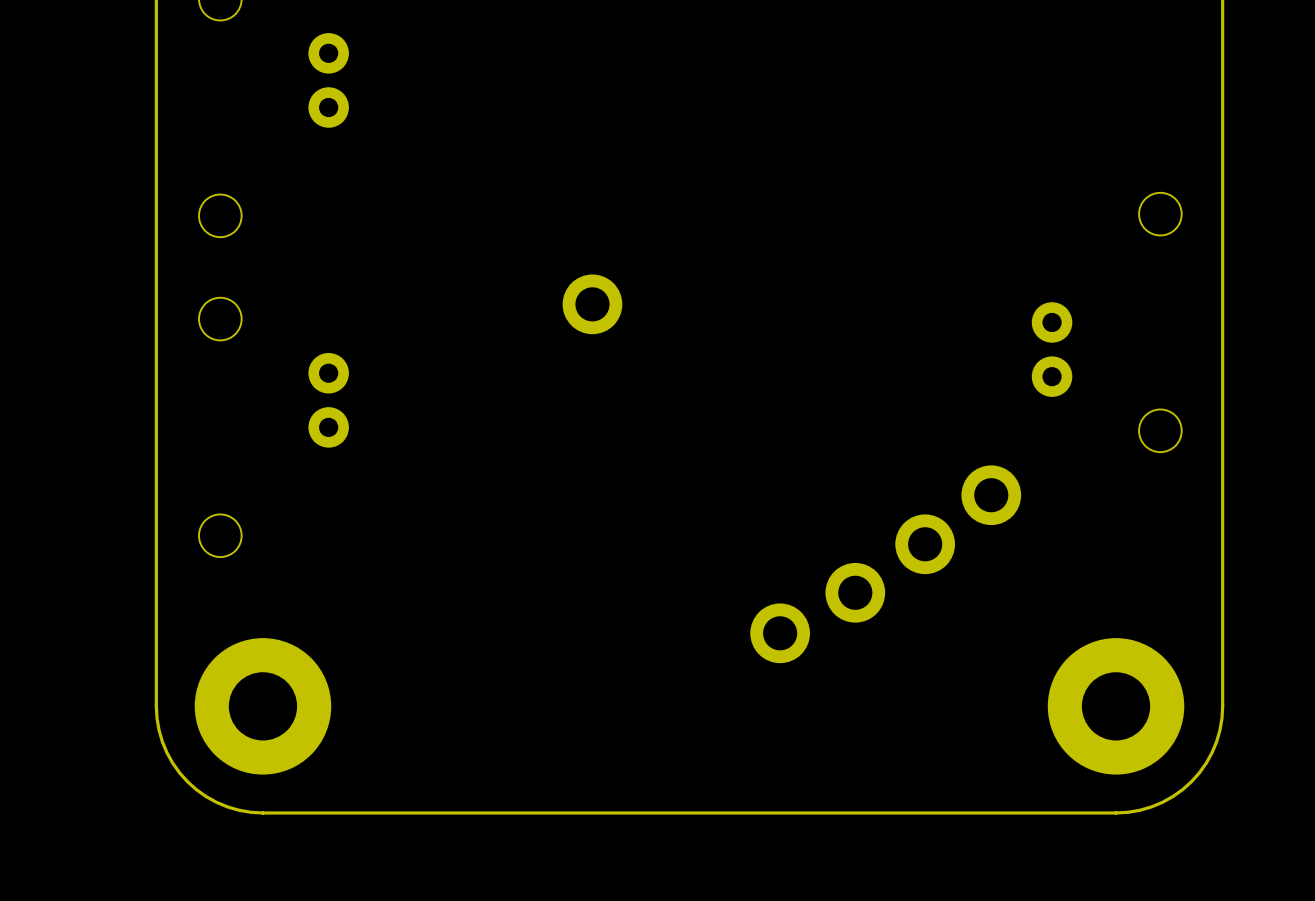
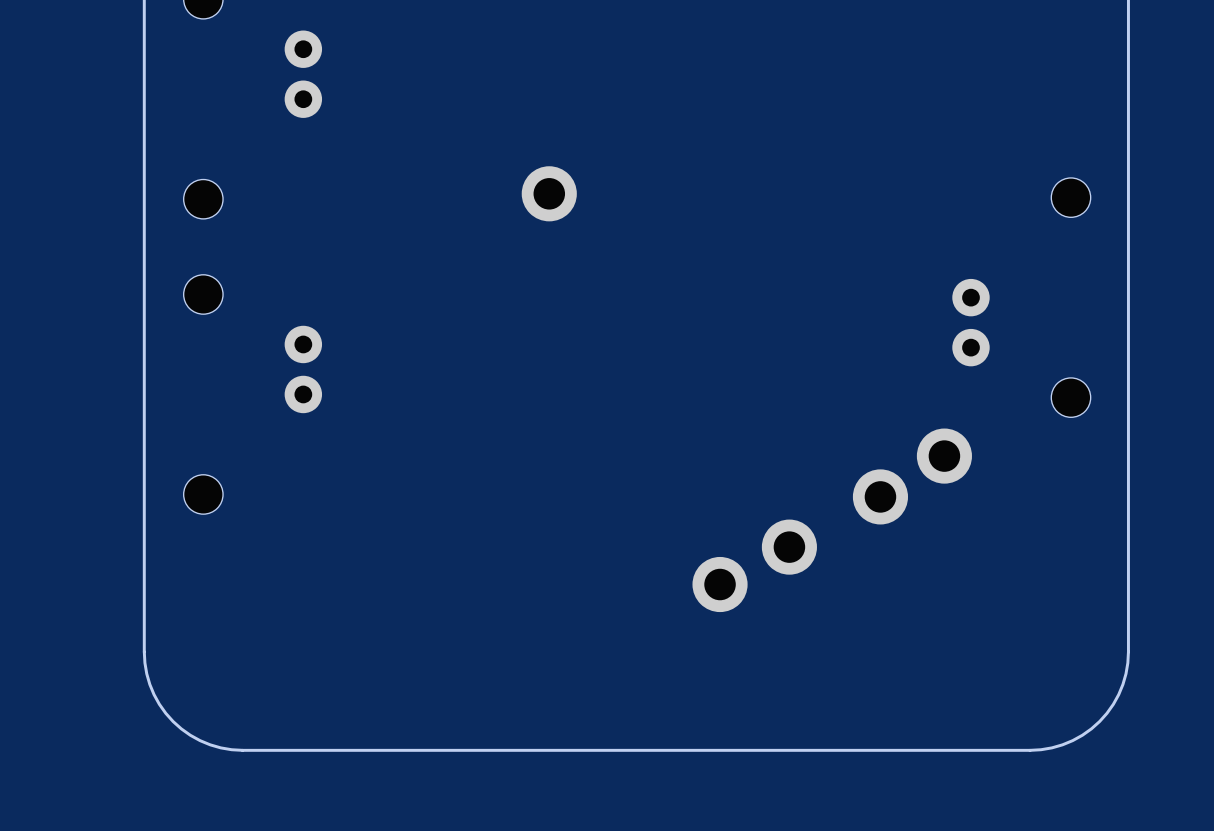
part position: (592, 304) -> (549, 193)
part: none -> (944, 456)
part: (991, 495) -> none
part: none -> (880, 496)
part: (925, 544) -> none
part: (262, 706) -> none
part: (1116, 706) -> none

